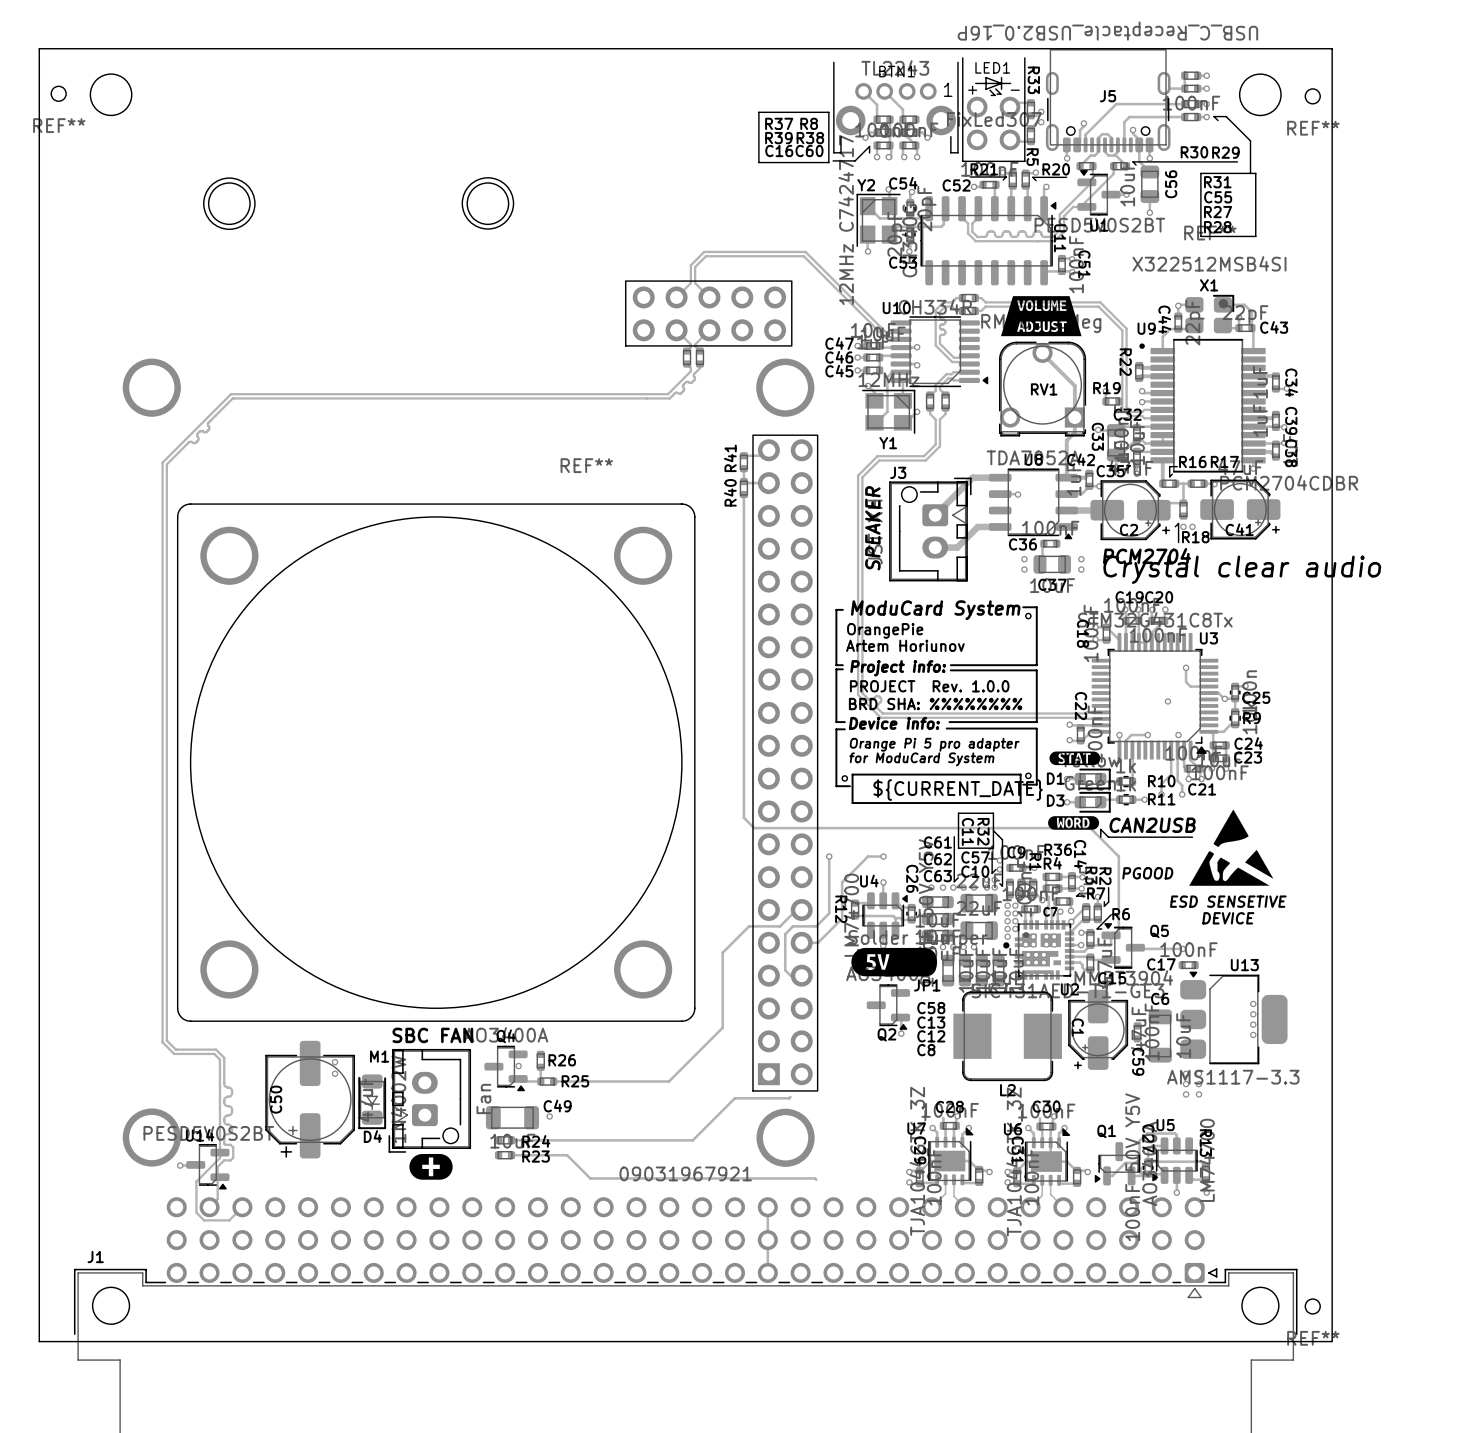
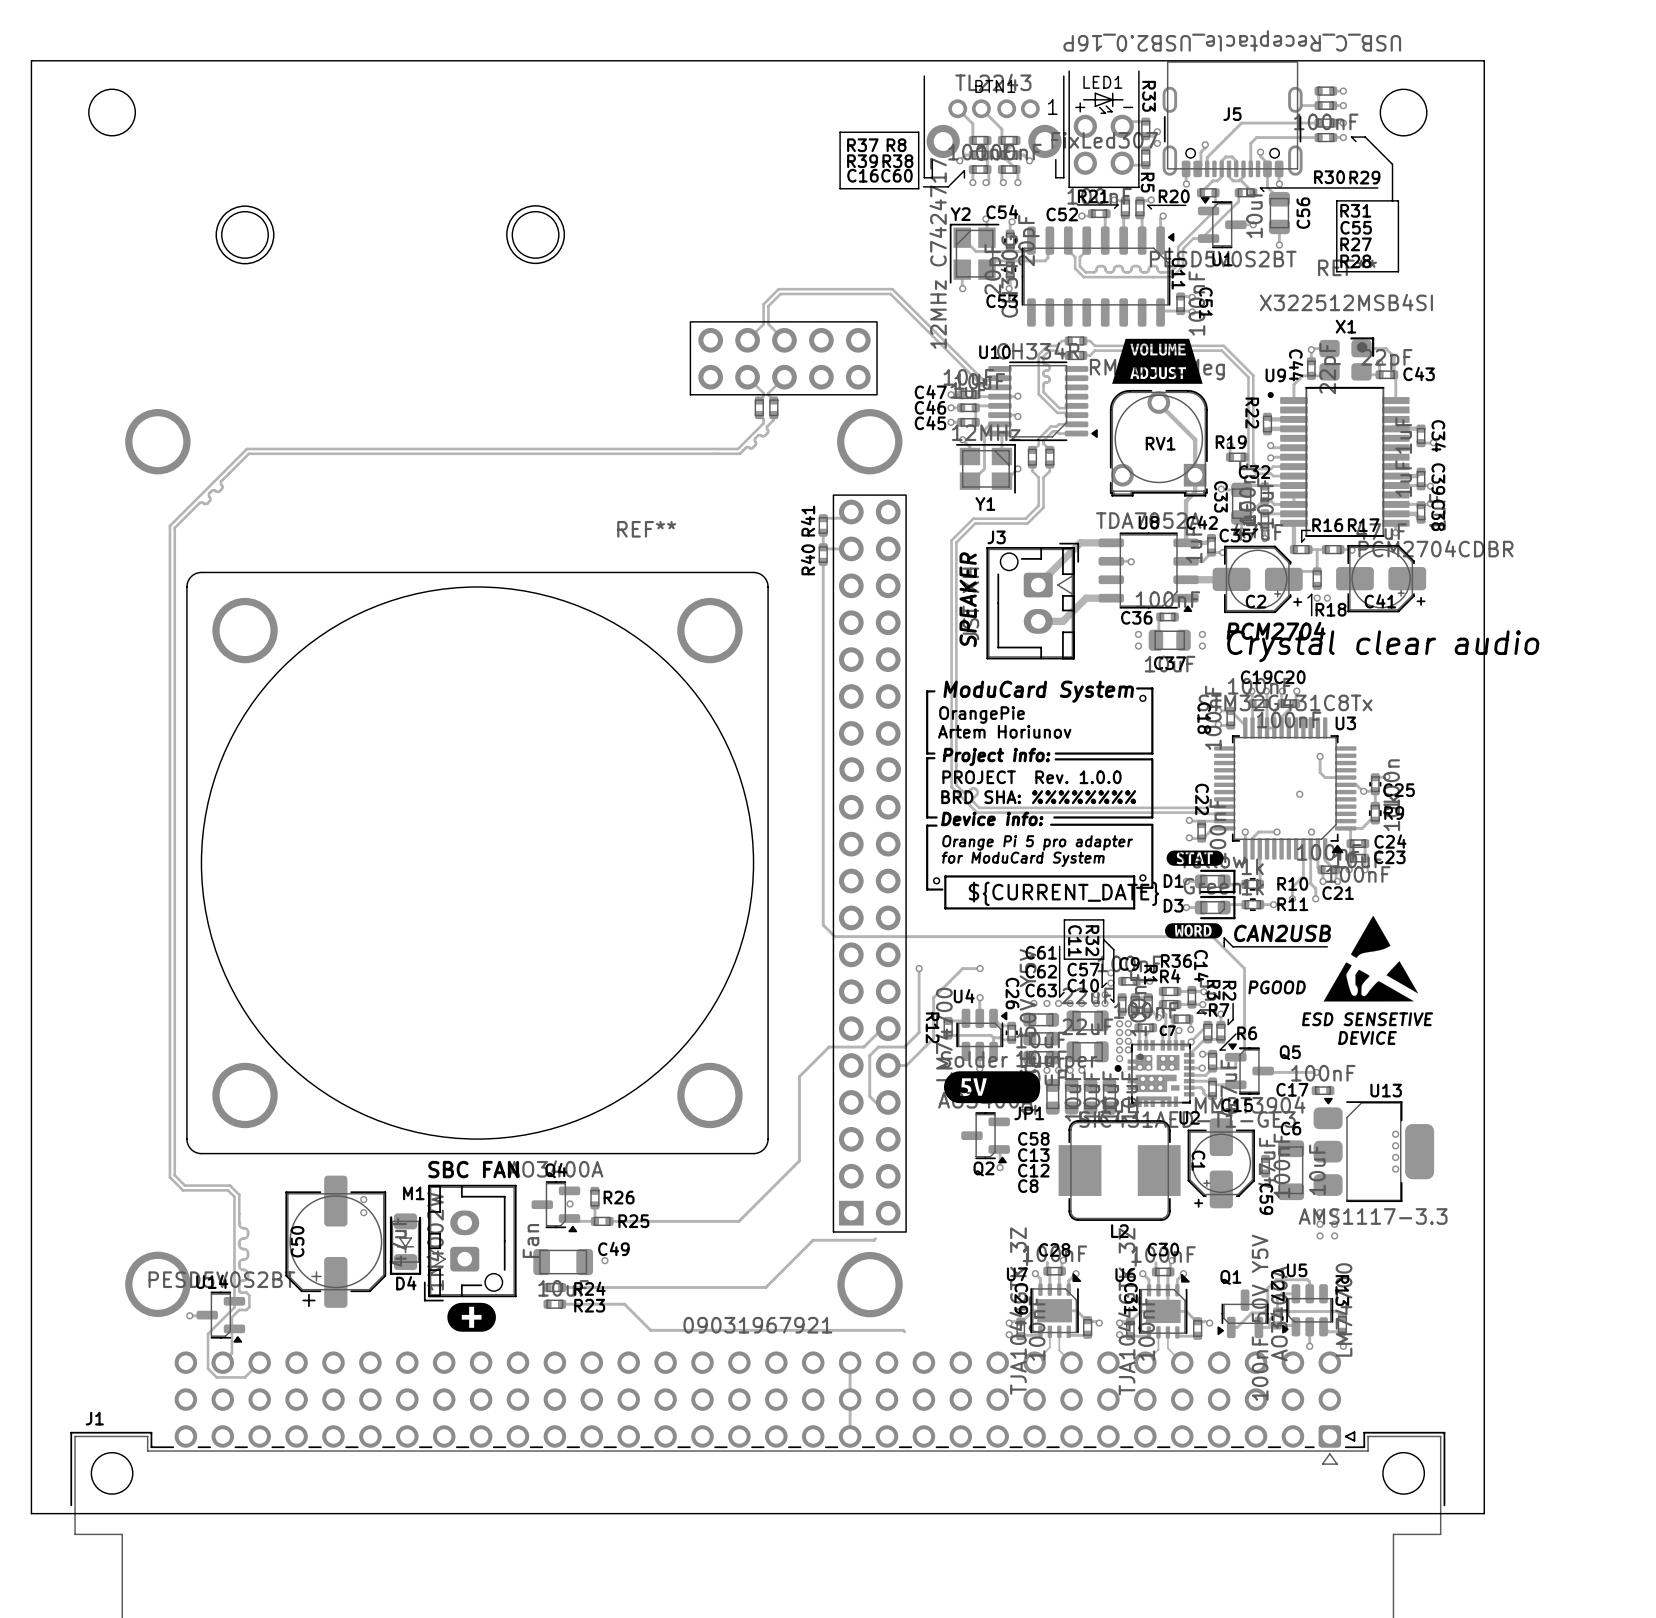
REF**: (58, 93) -> none
REF**: (1312, 96) -> none
REF**: (1312, 1306) -> none

